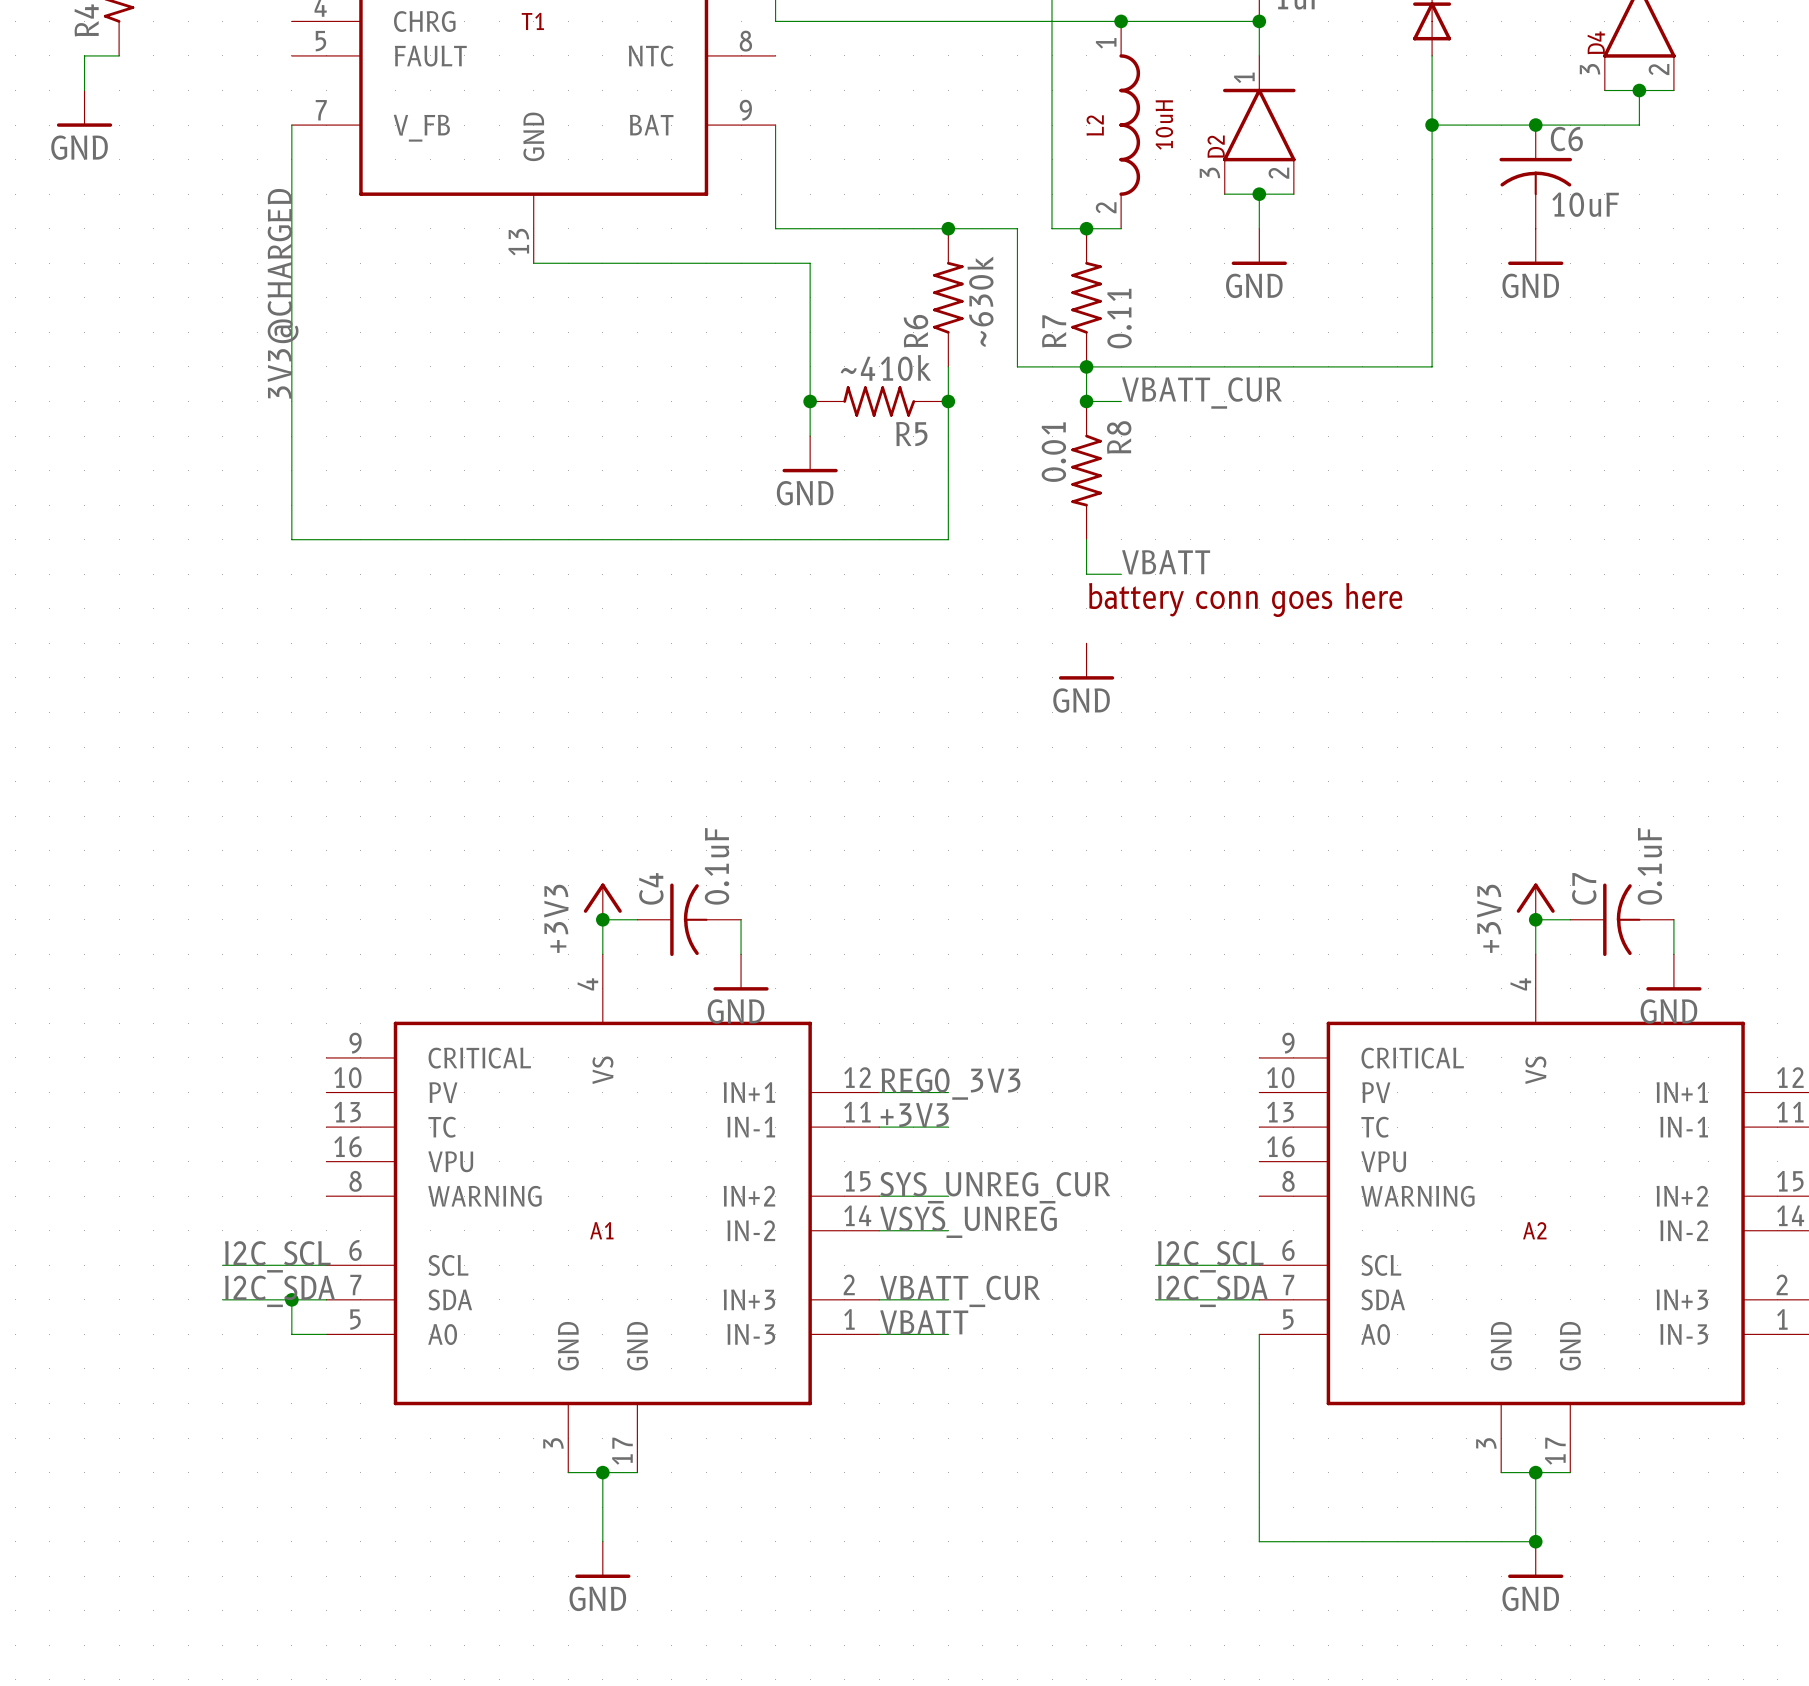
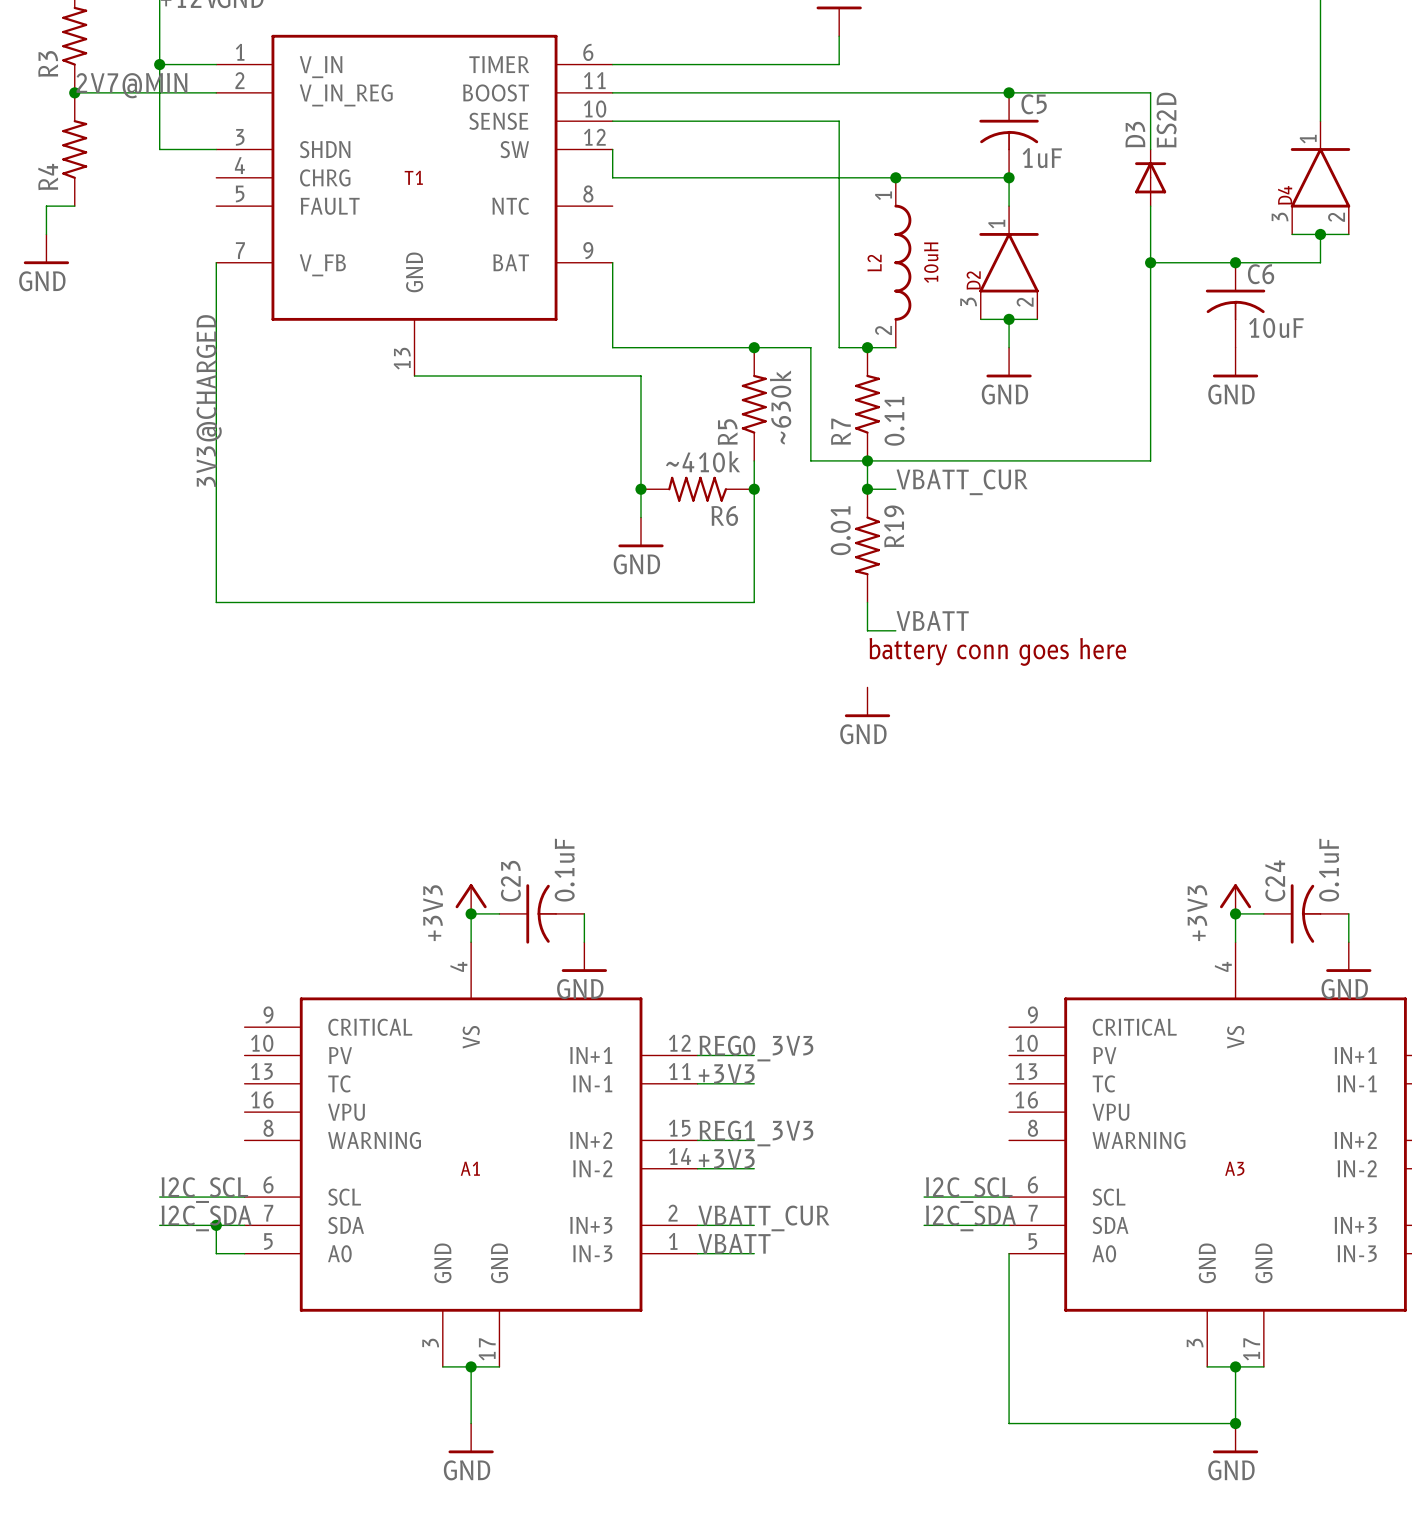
R6 name: R6 (916, 331) -> R5 (727, 432)
R5 name: R5 (911, 434) -> R6 (724, 515)
R8 name: R8 (1119, 437) -> R19 (894, 526)
C4 name: C4 (651, 888) -> C23 (510, 881)
C7 name: C7 (1584, 888) -> C24 (1275, 880)
label: SYS_UNREG_CUR (995, 1187) -> REG1_3V3 (756, 1133)
label: VSYS_UNREG (968, 1222) -> +3V3 (726, 1158)
A2 name: A2 (1534, 1230) -> A3 (1234, 1168)

